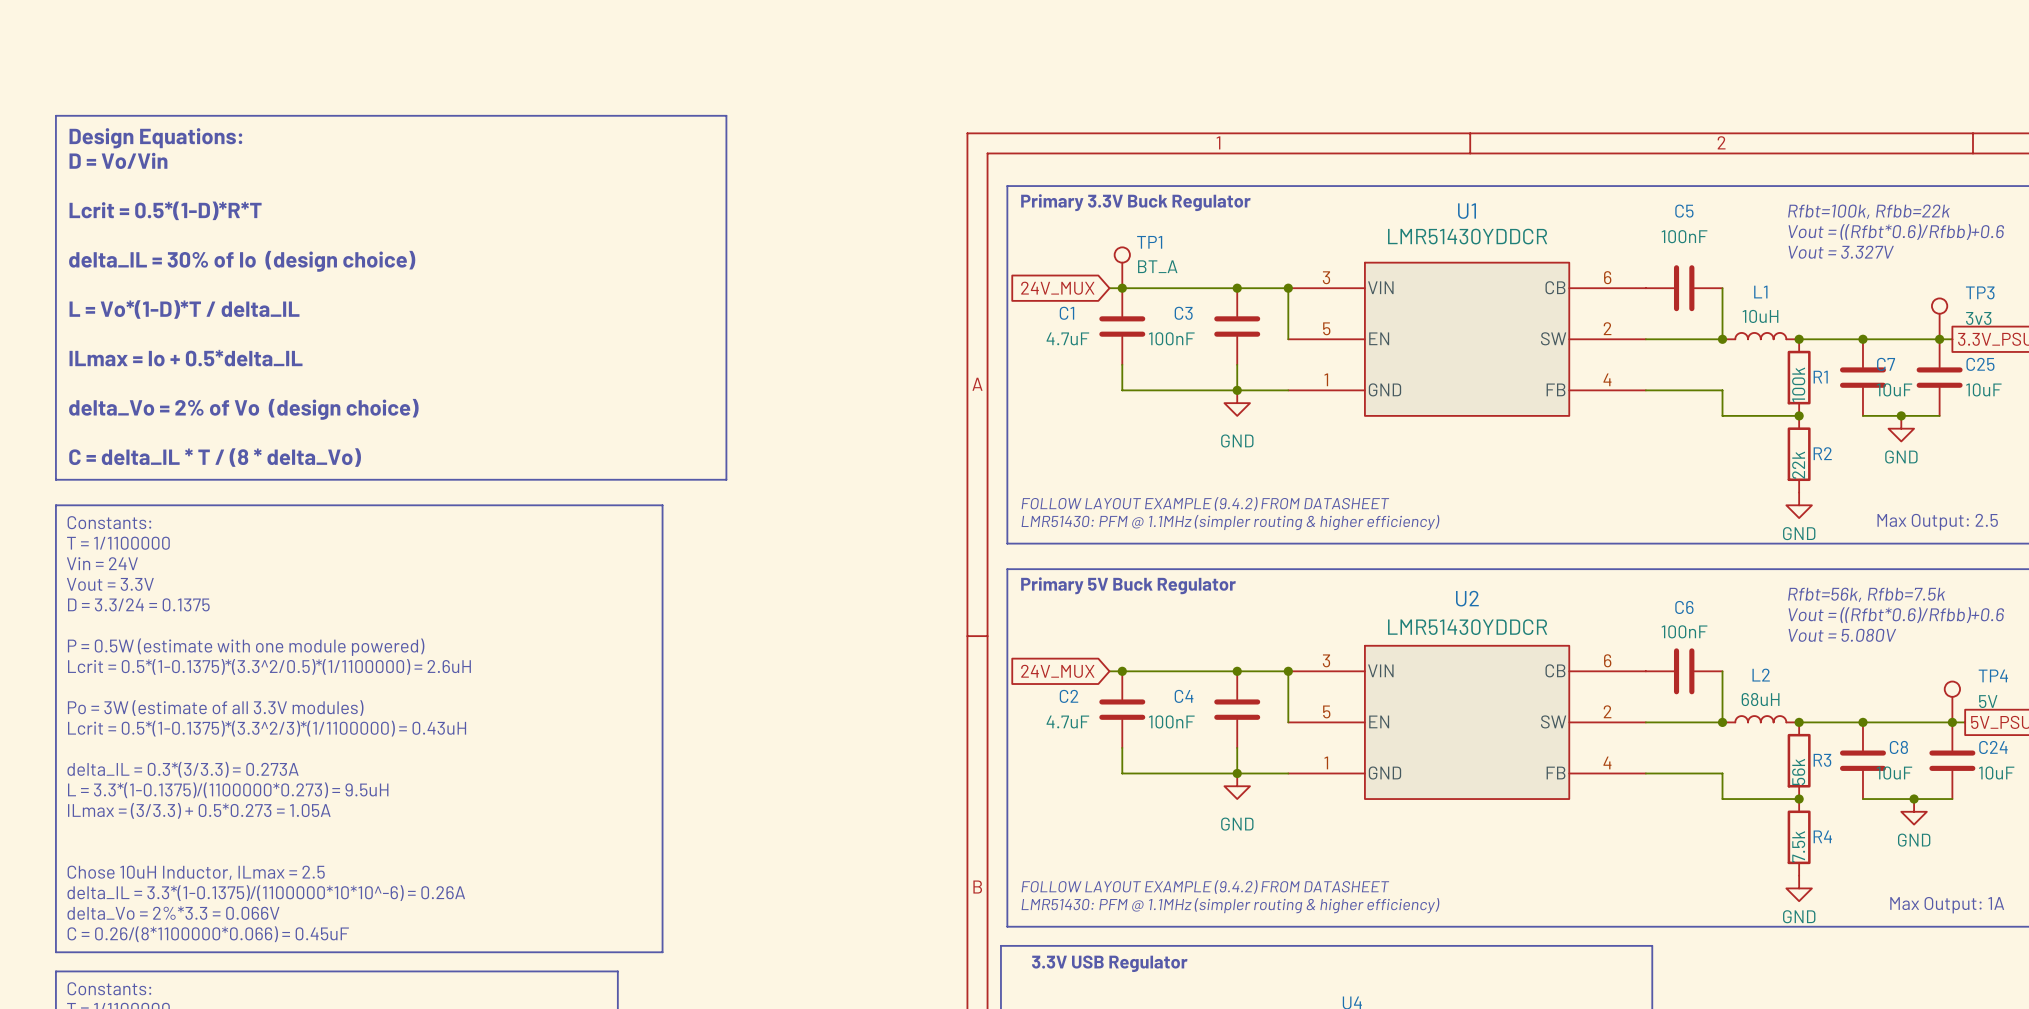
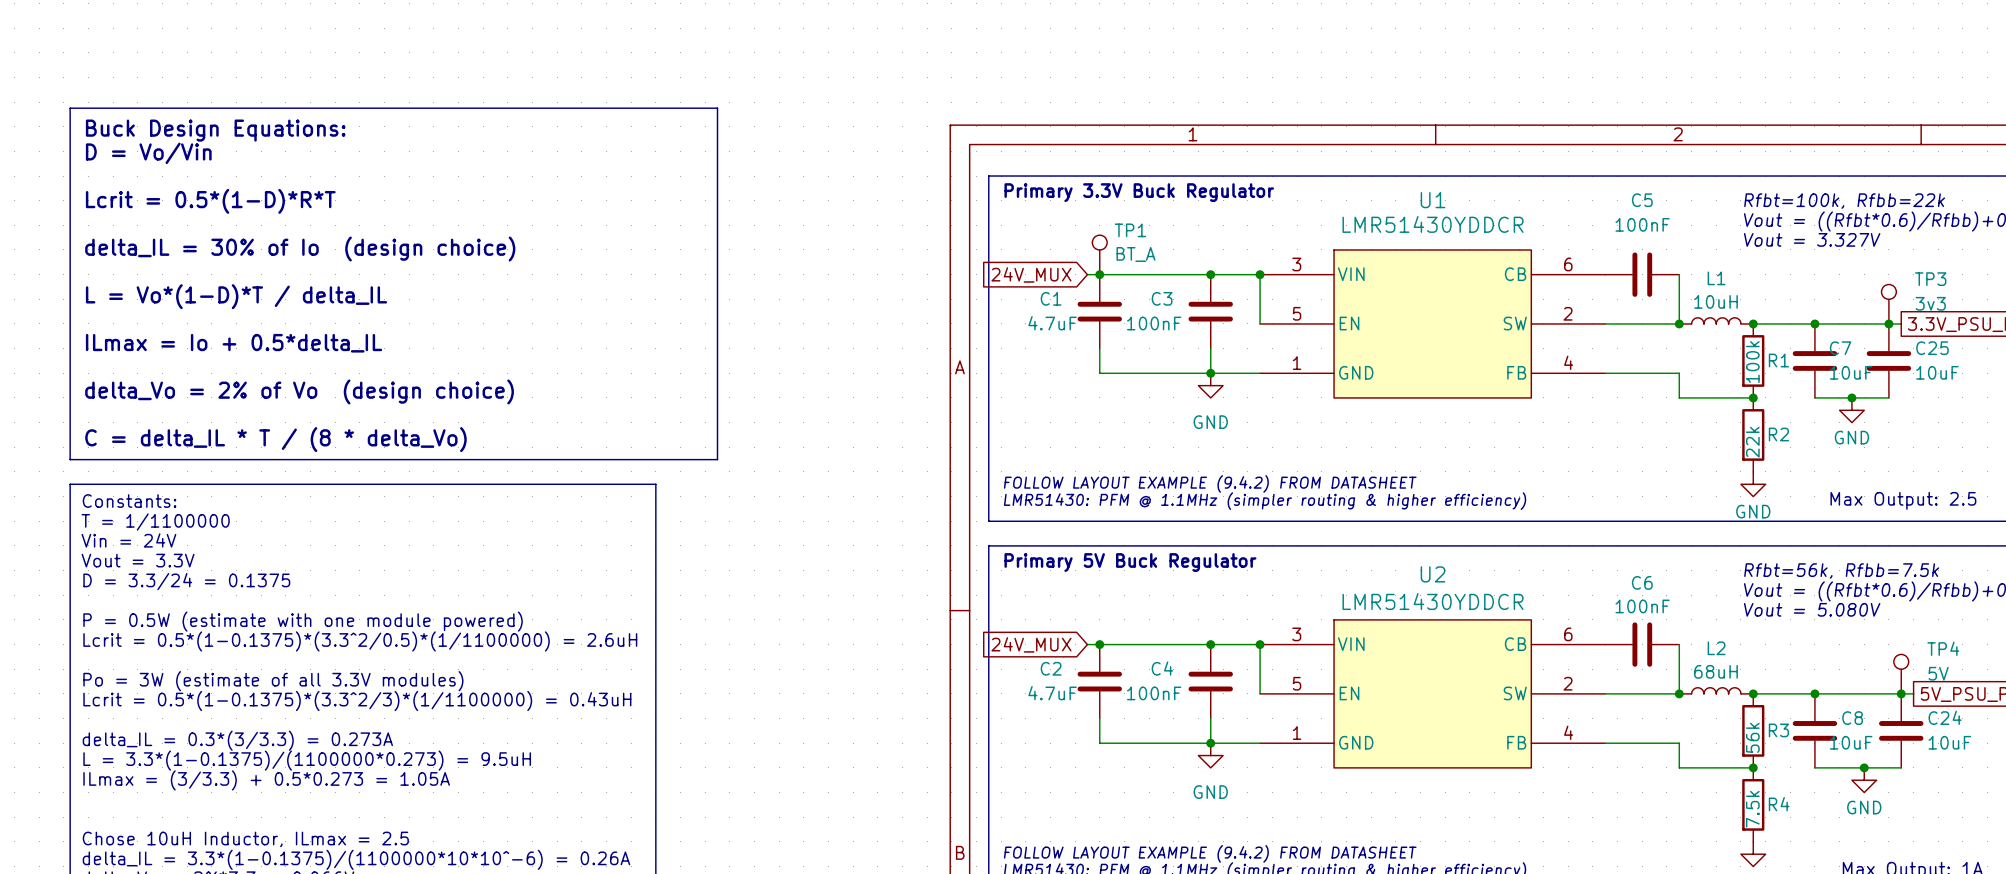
text: Design Equations: (155, 138) -> Buck Design Equations: (215, 130)

